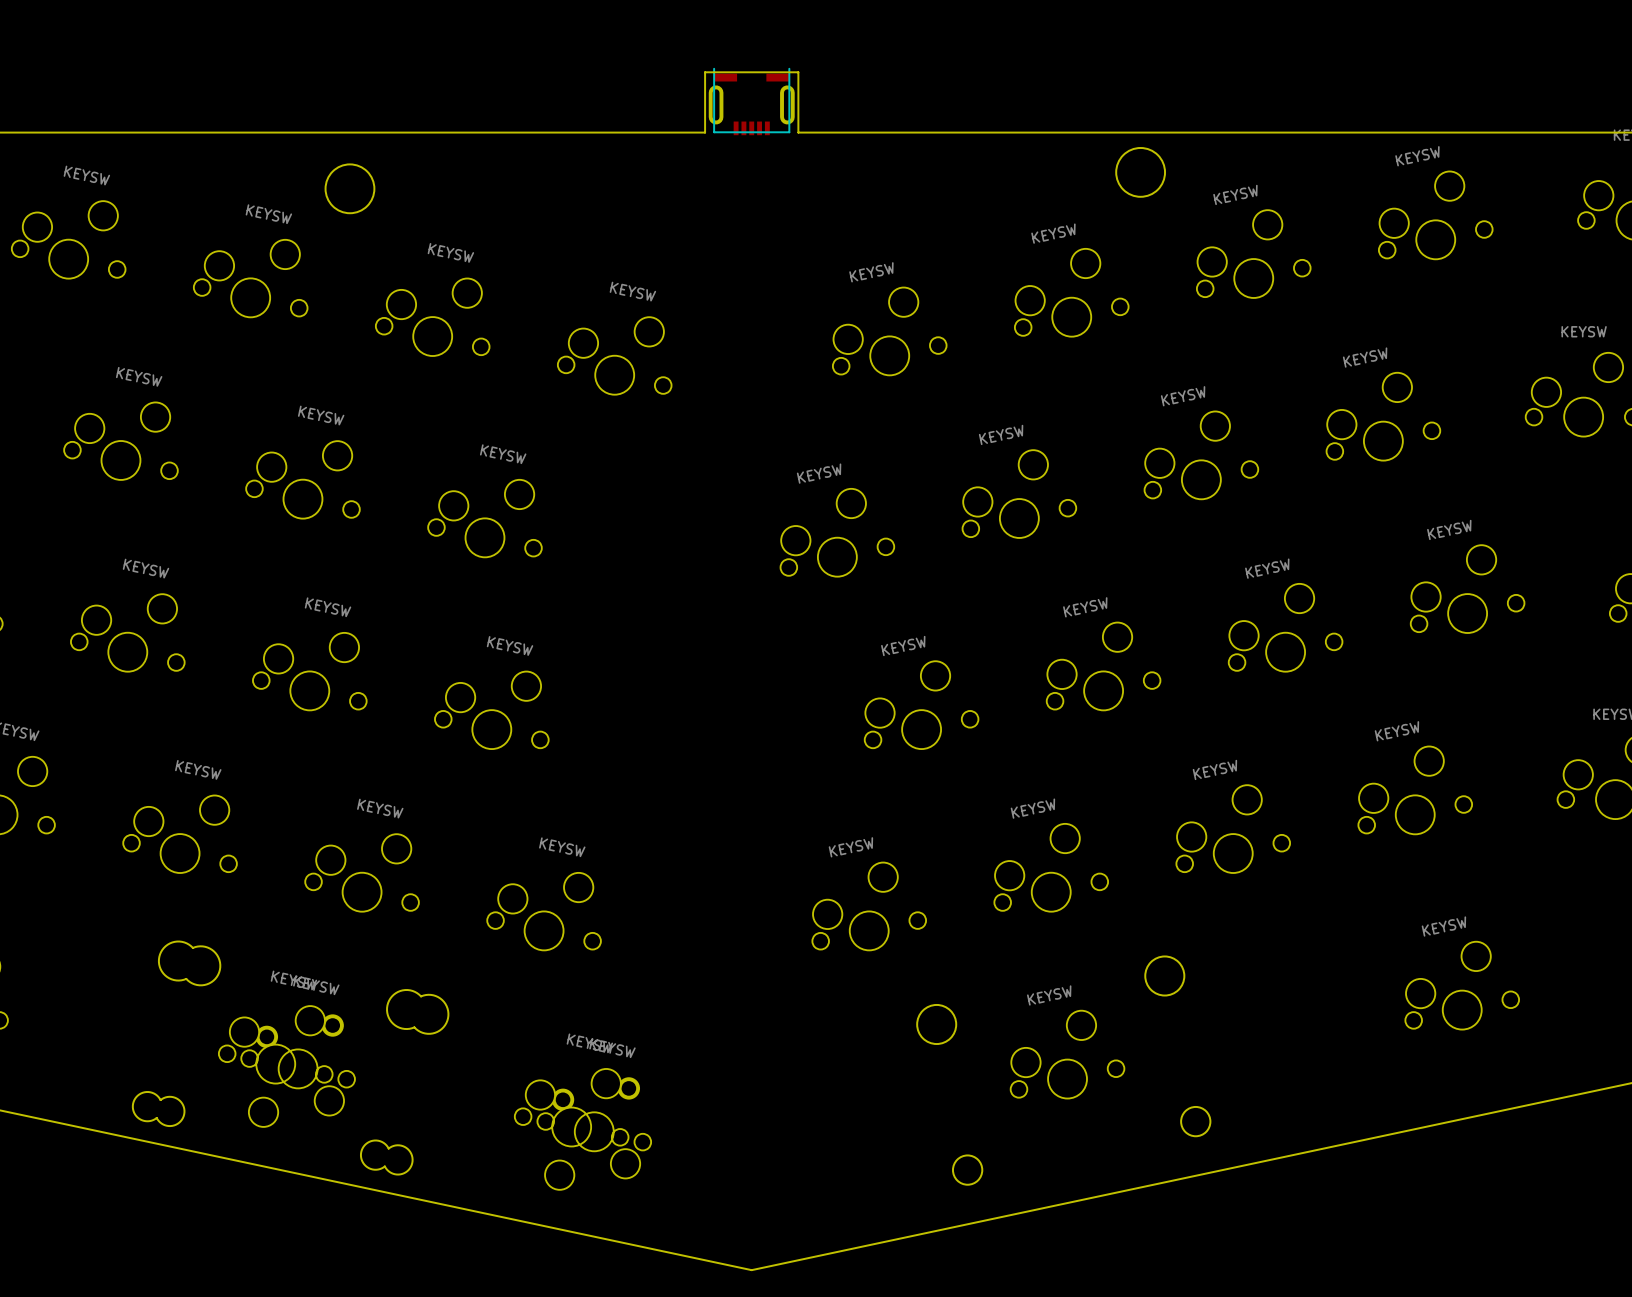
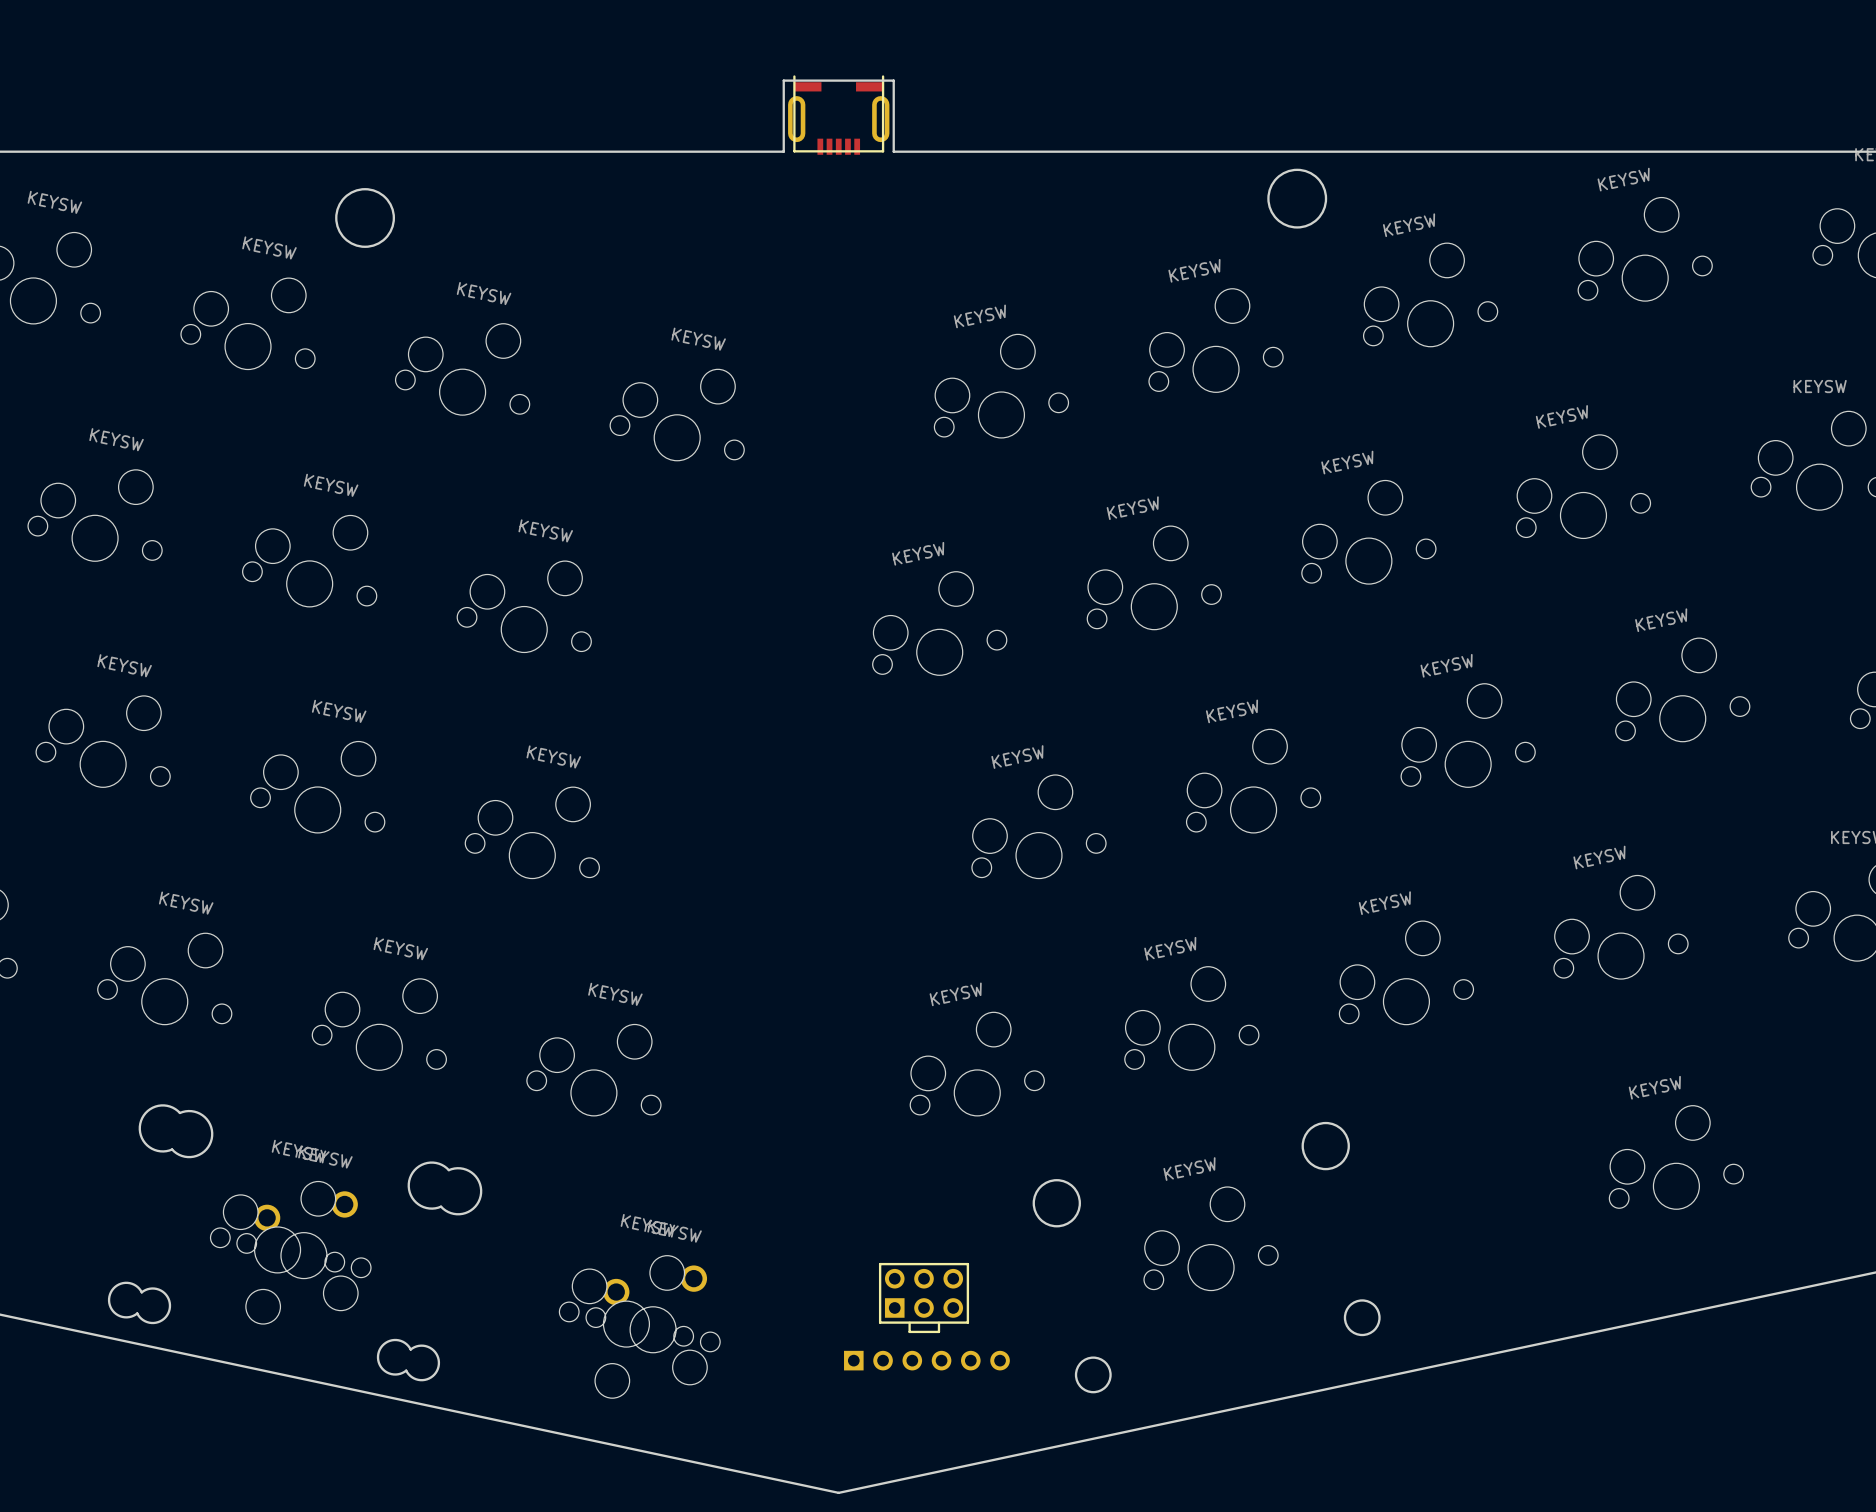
part: none -> (924, 1298)
part: none -> (853, 1360)
part: none -> (883, 1360)
part: none -> (912, 1360)
part: none -> (941, 1360)
part: none -> (970, 1360)
part: none -> (1000, 1360)

